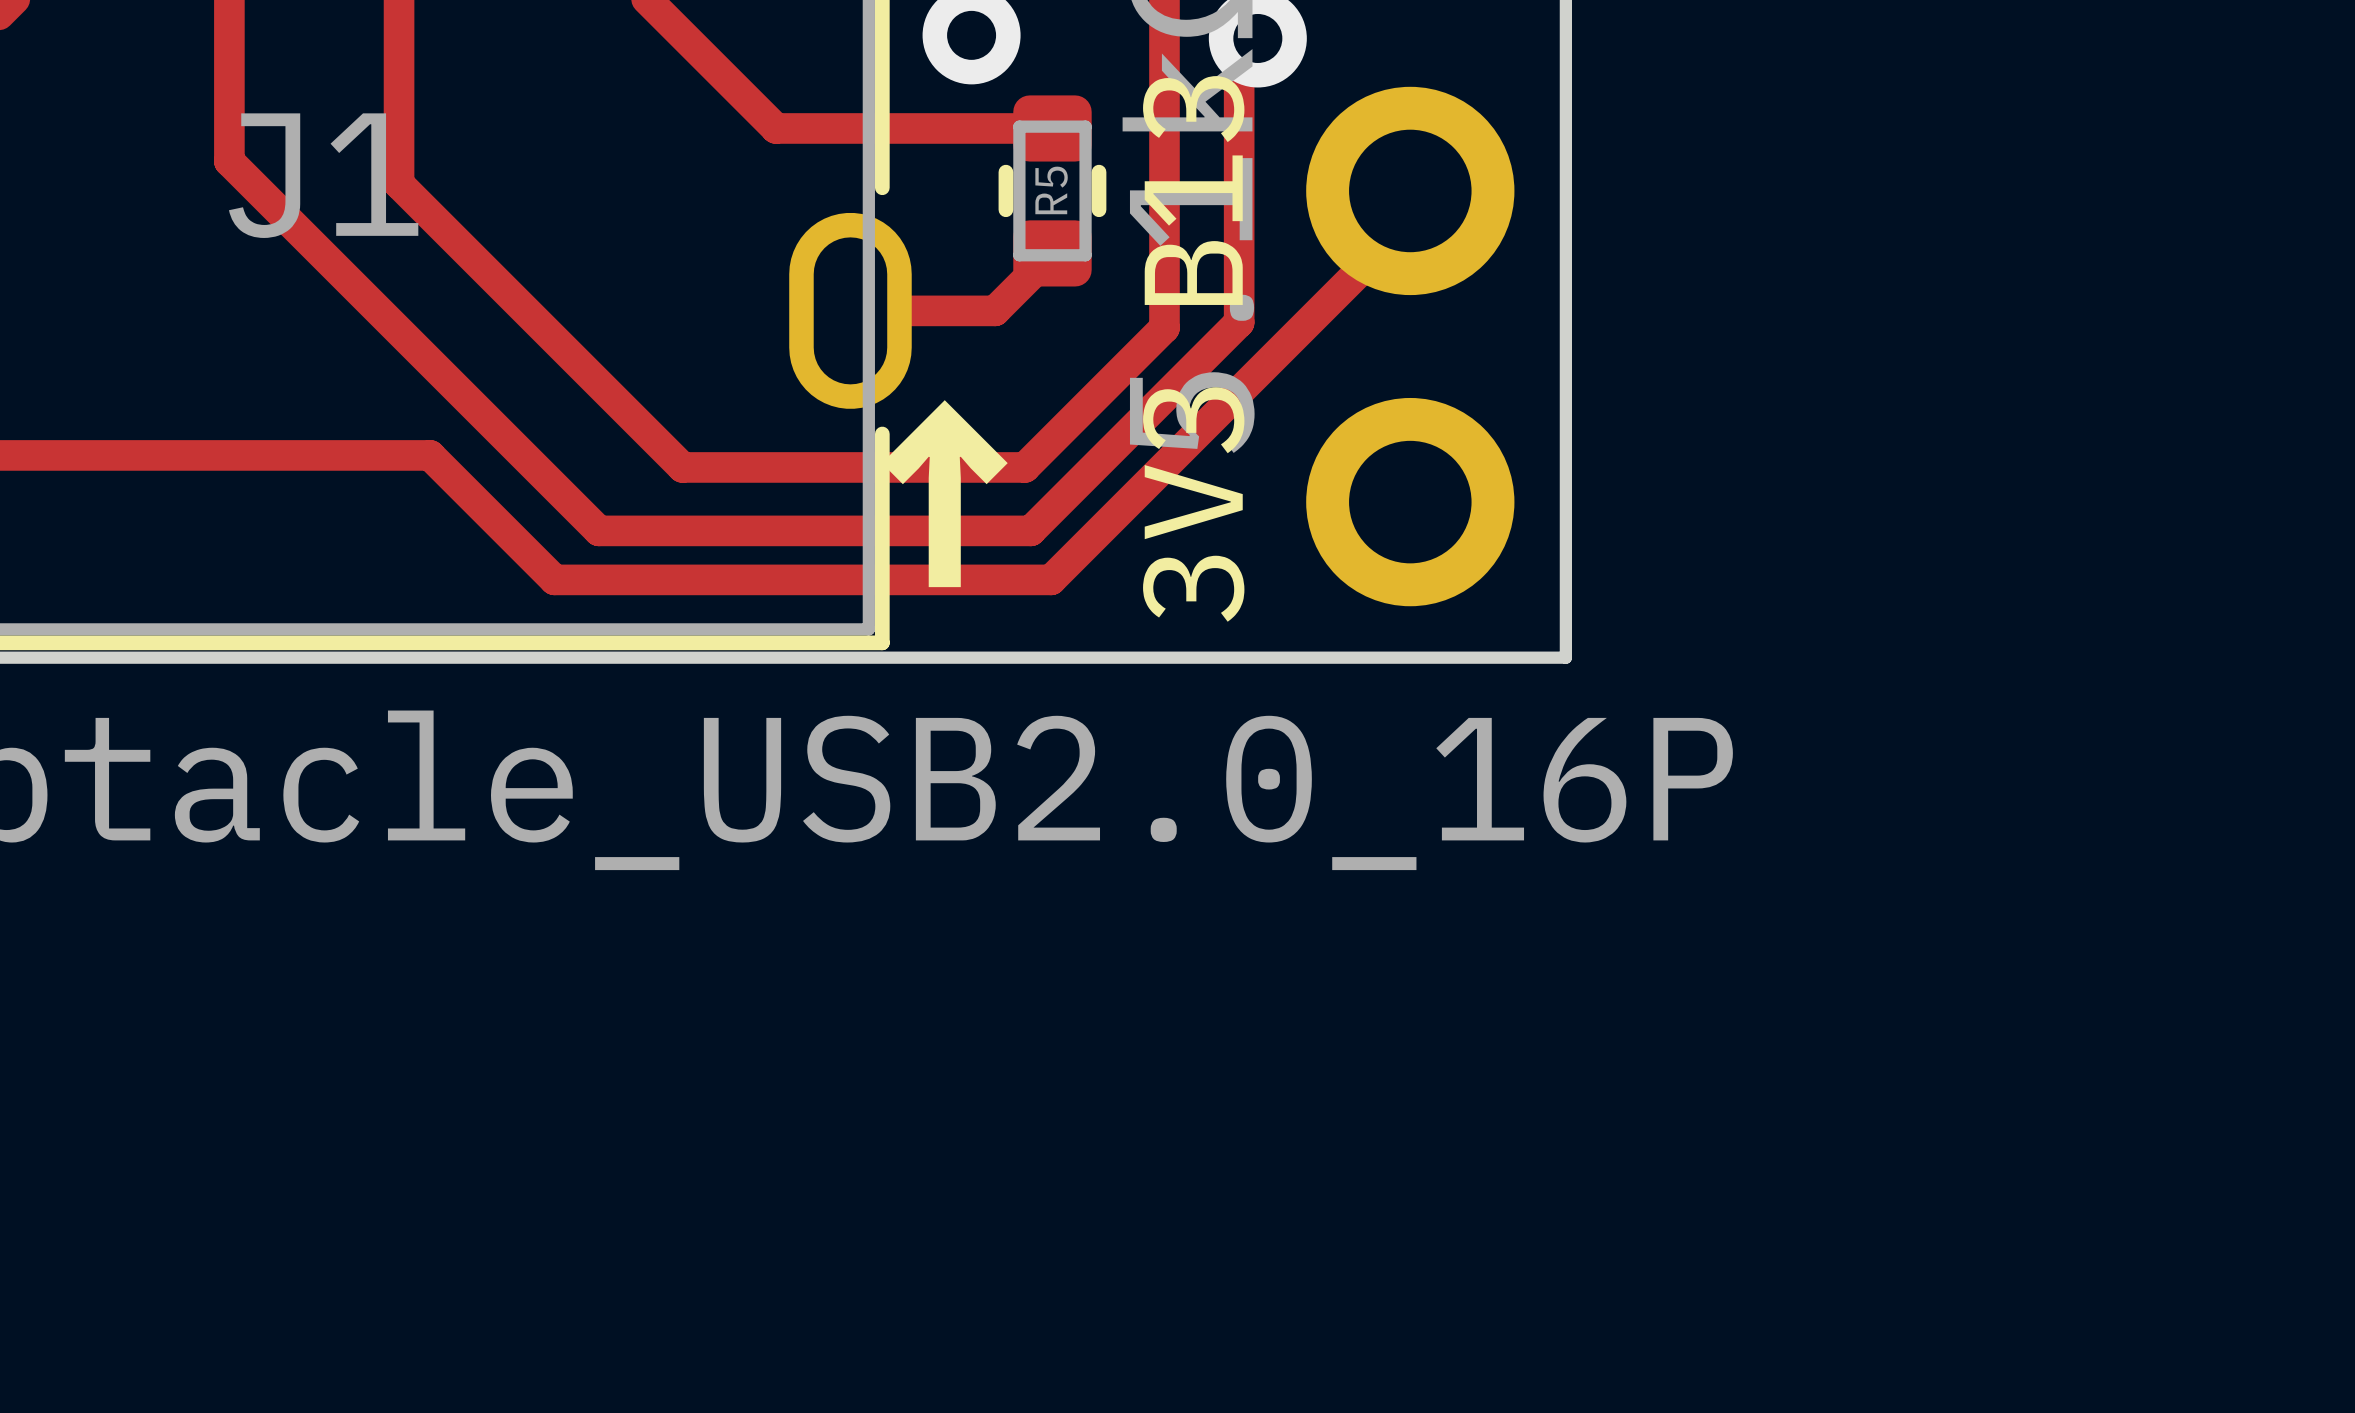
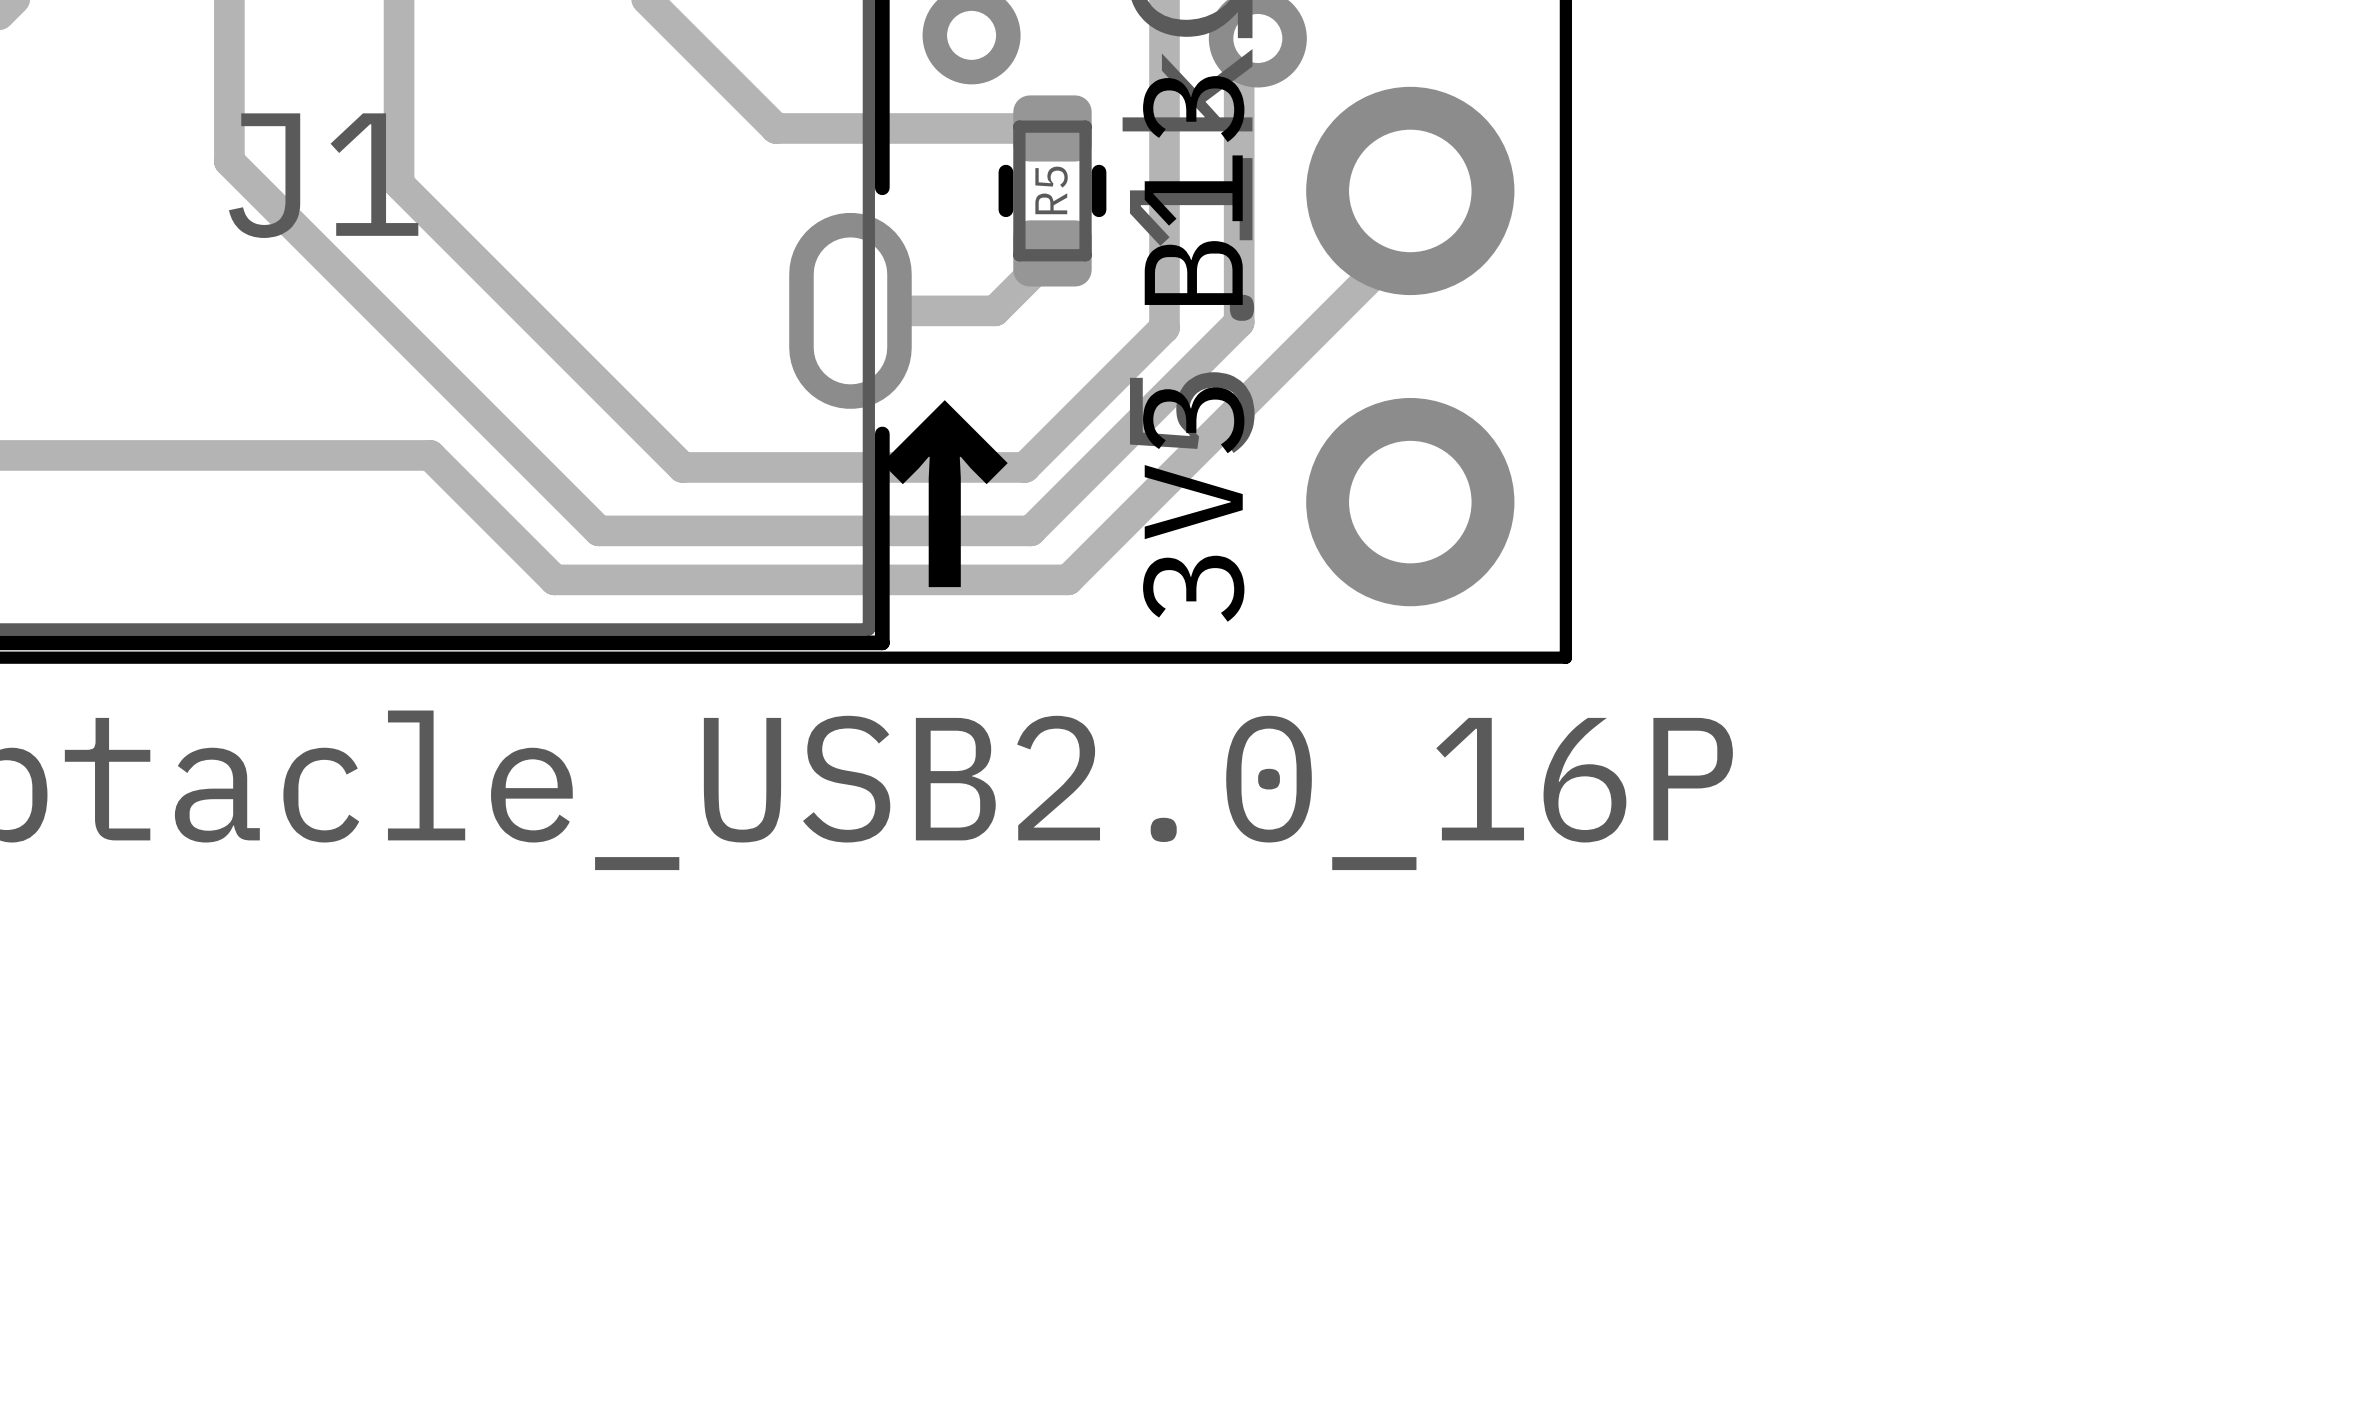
track: (1410, 220) (1051, 579) -> (1410, 220) (1410, 237) (1068, 579) (1051, 579)

